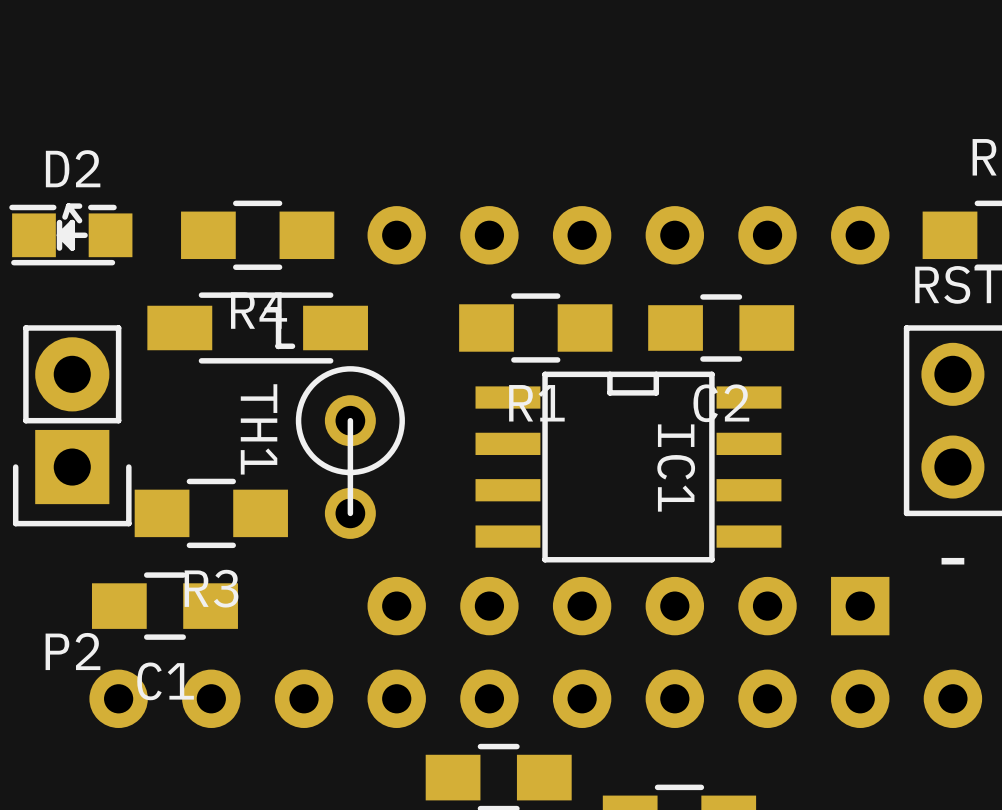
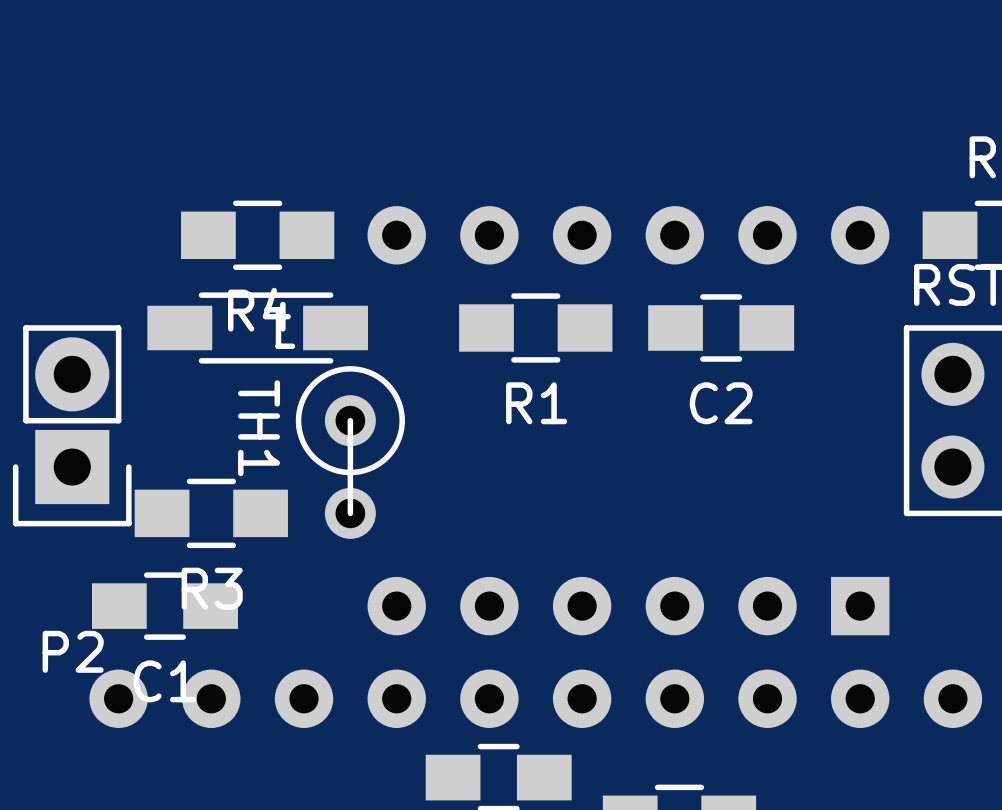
D2: (70, 234) -> none
IC1: (628, 467) -> none
text: - (952, 561) -> none

